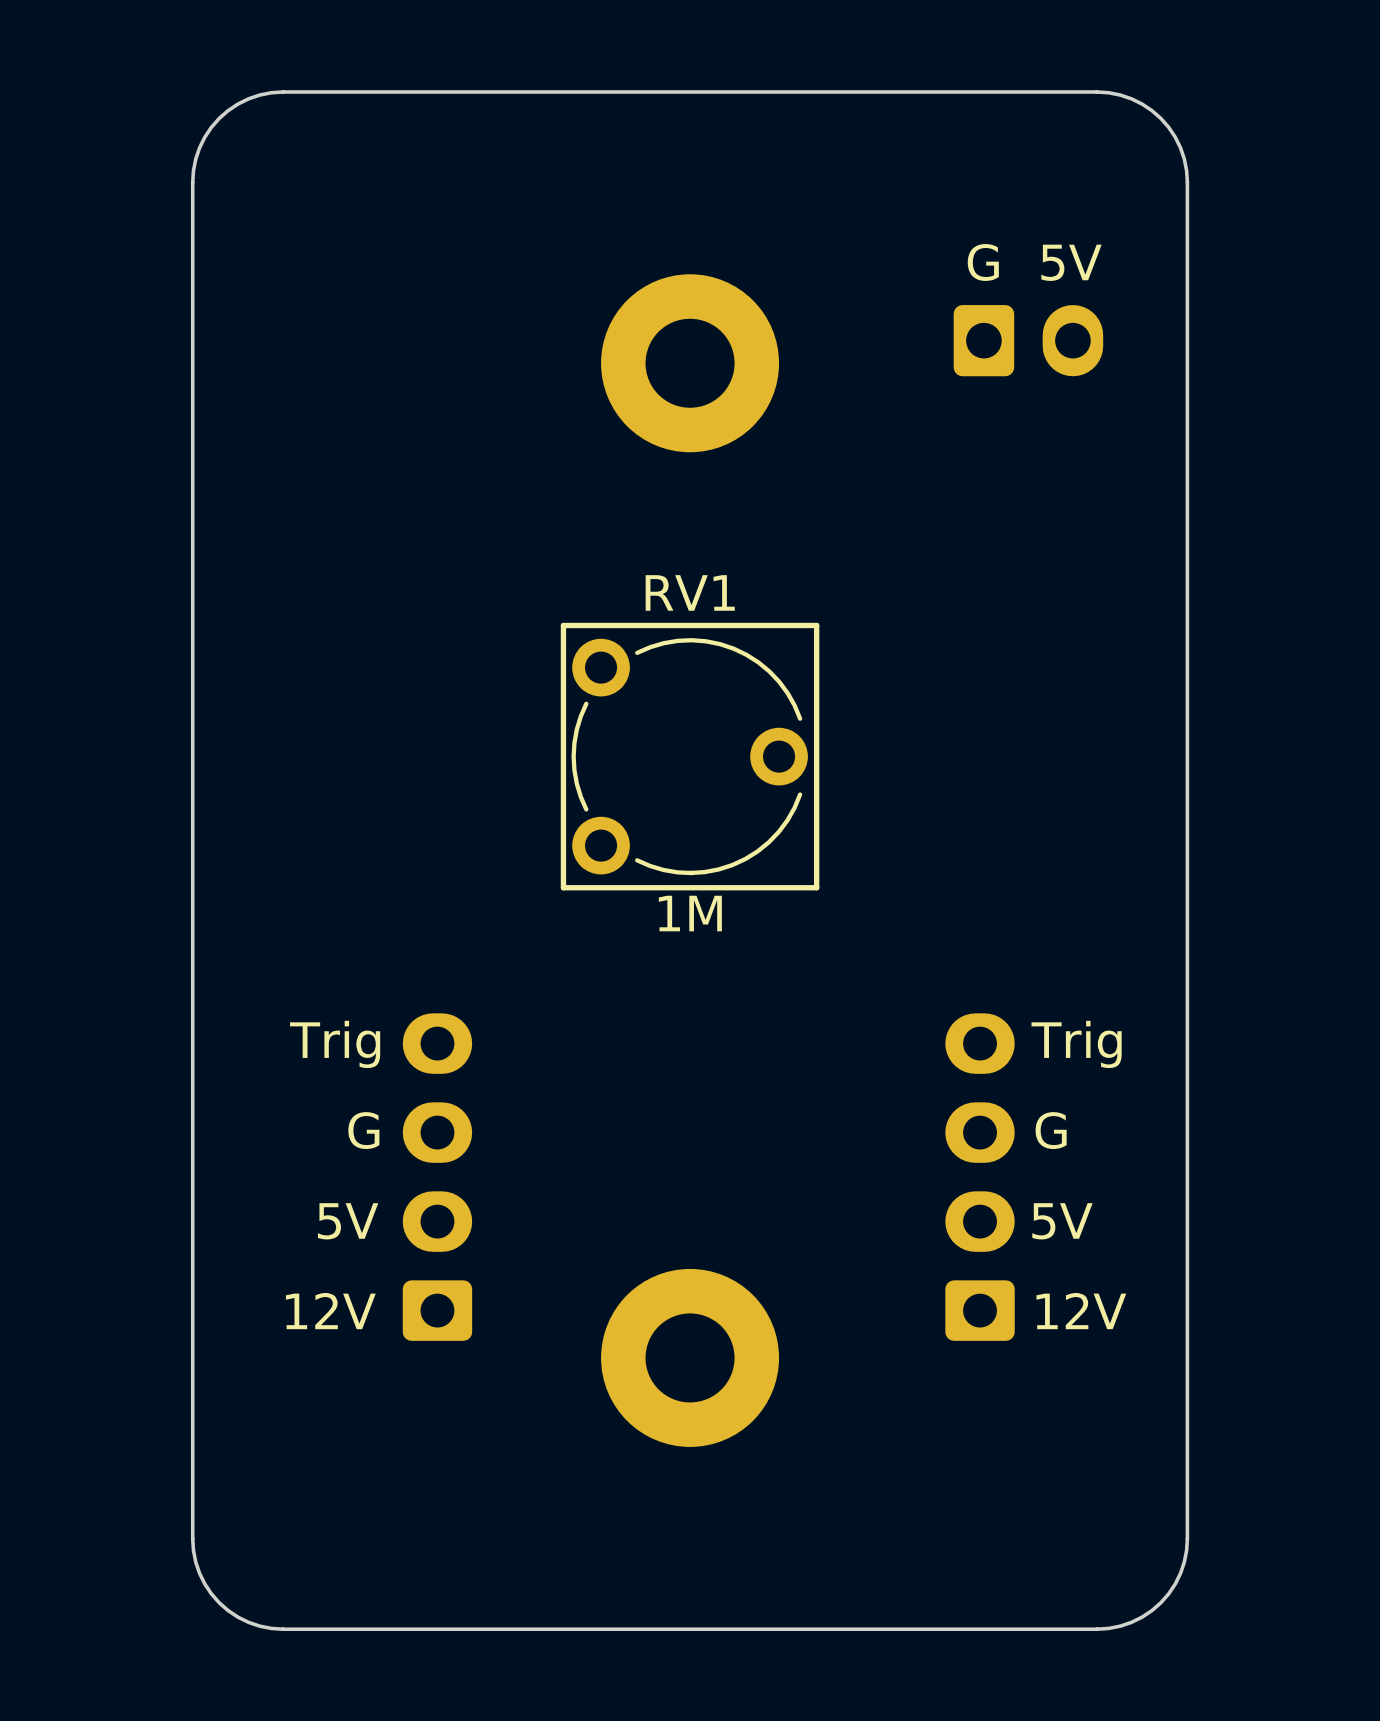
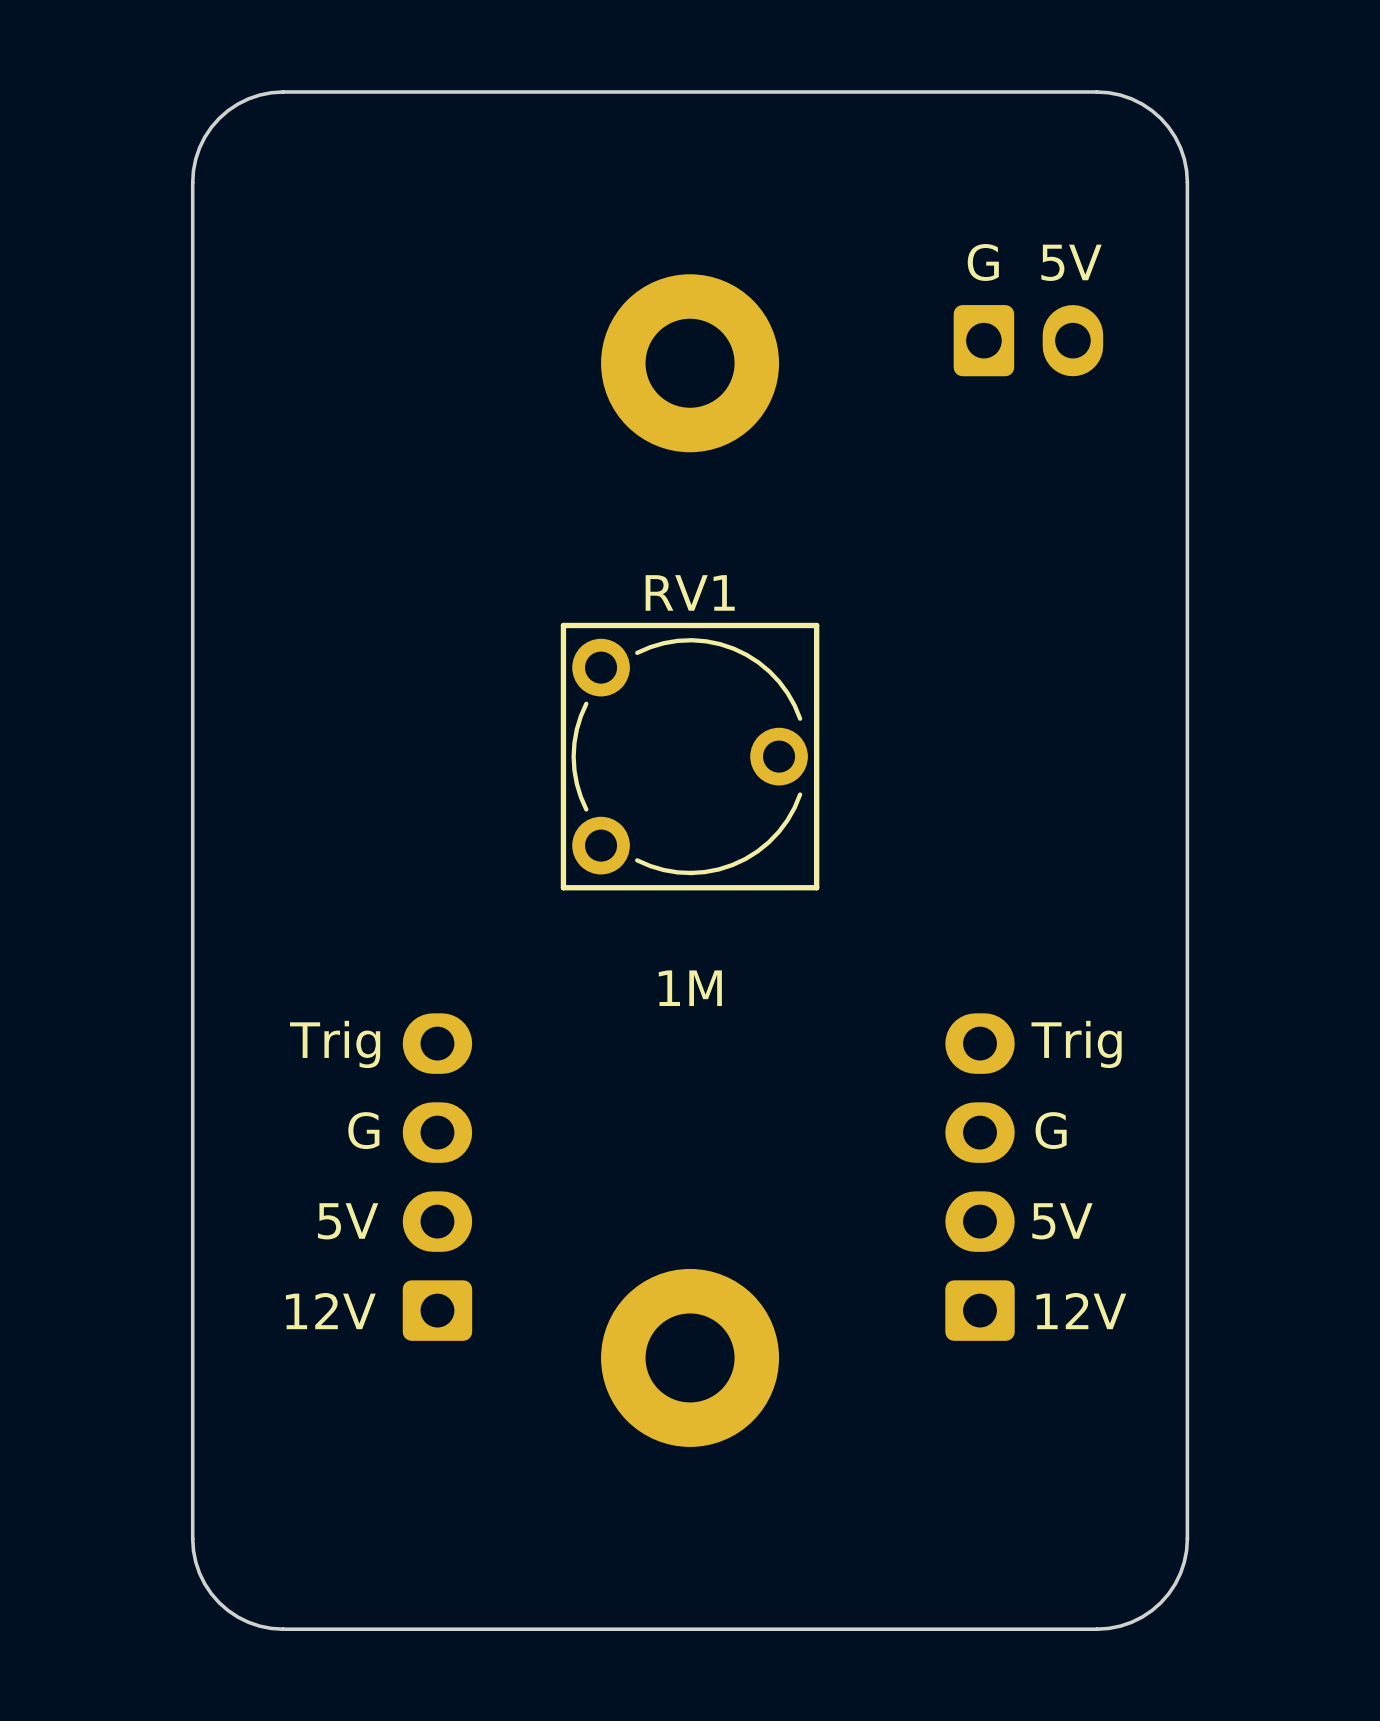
text position: 1M (690, 913) -> 1M (690, 988)

